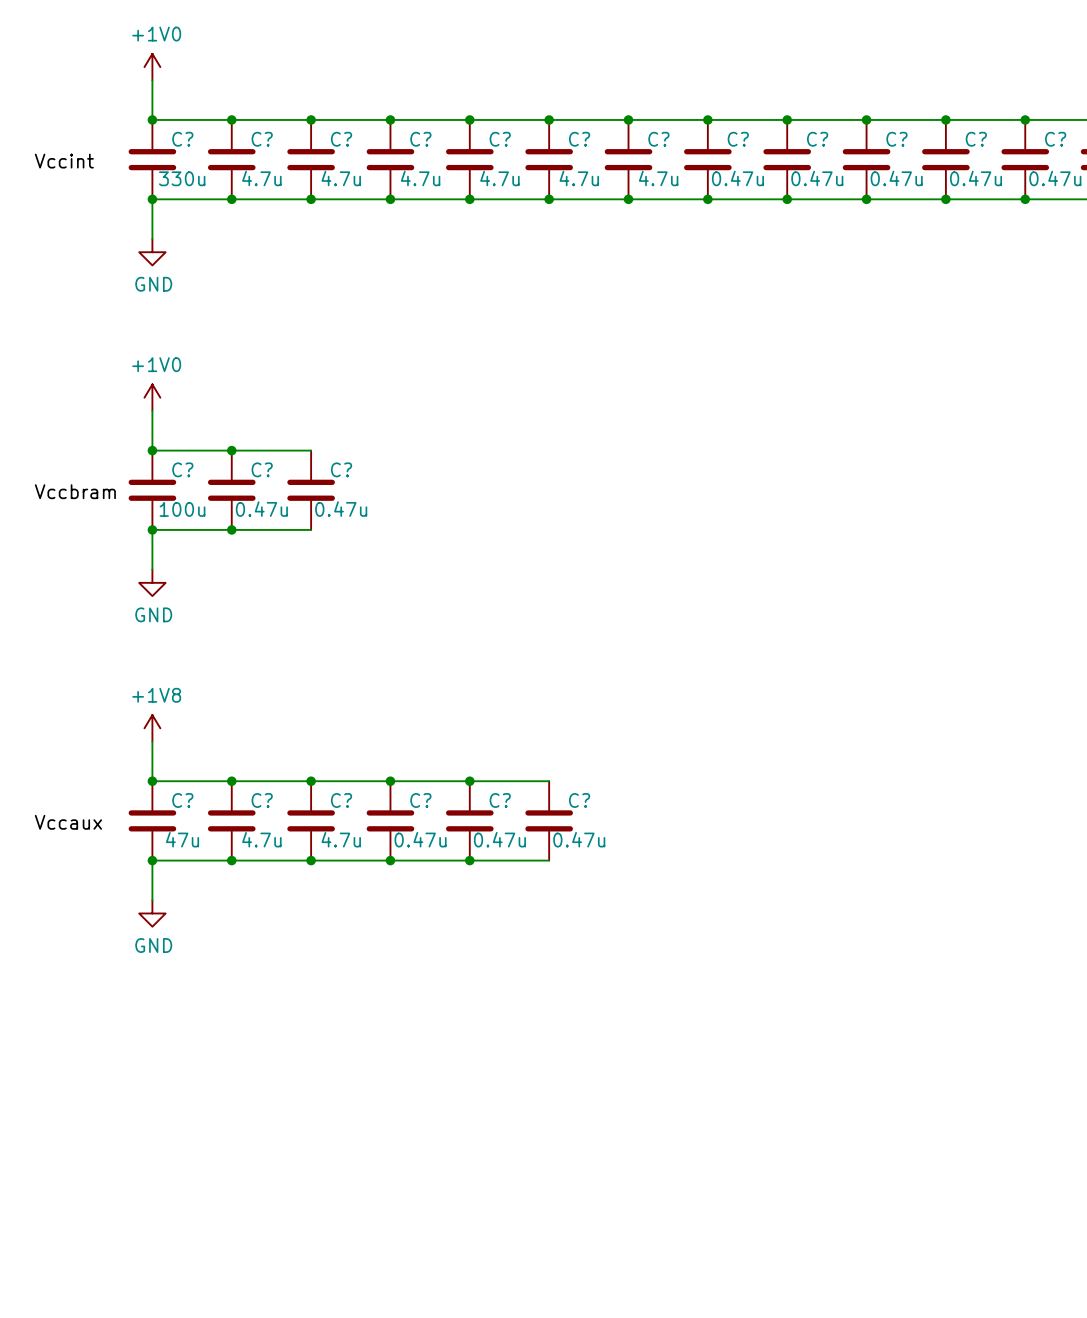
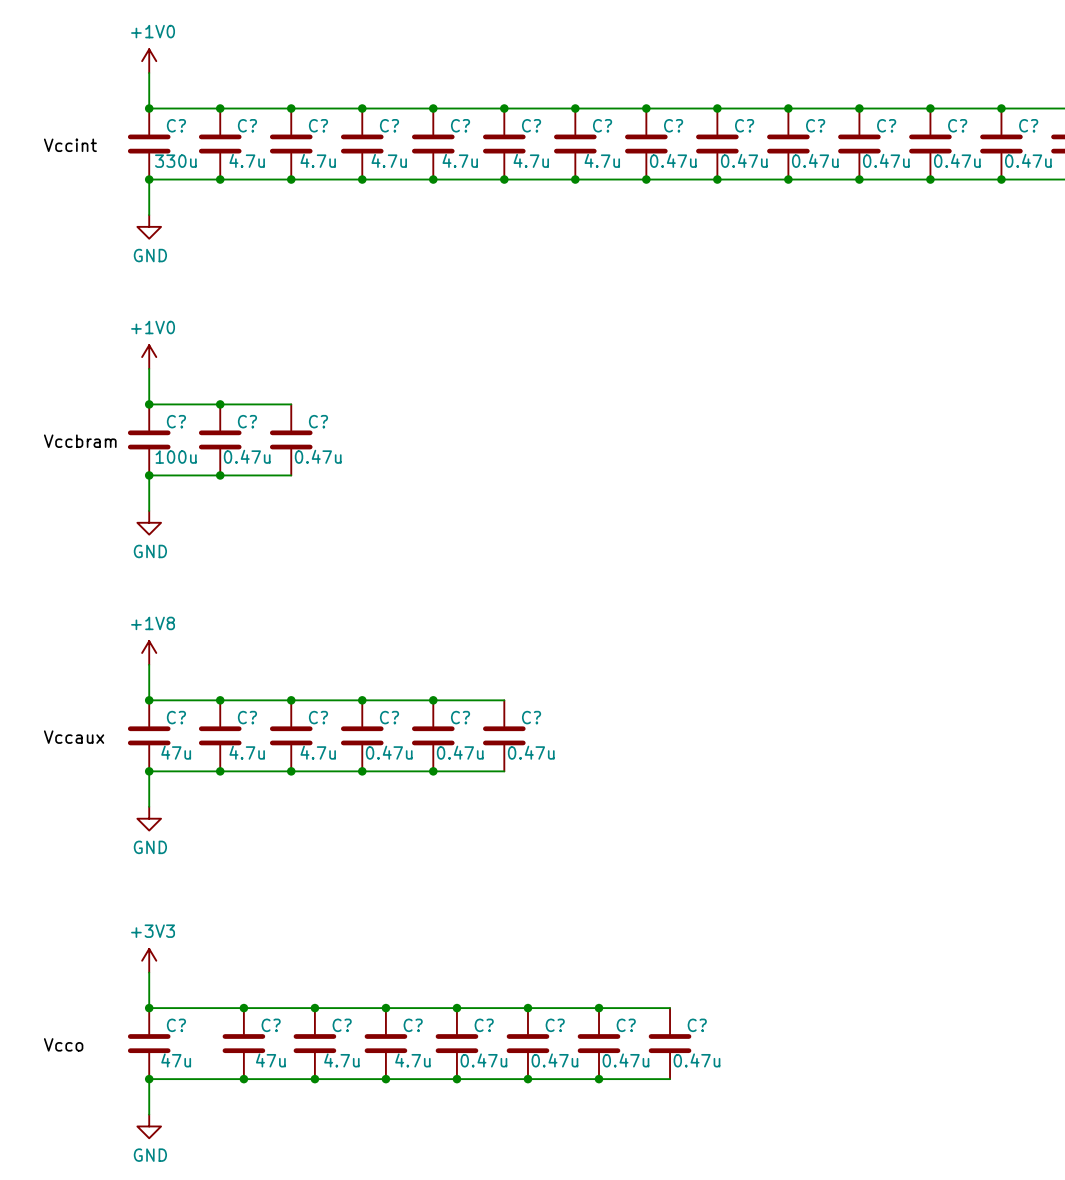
power symbol: none -> +3V3 (149, 960)
wire: none -> (149, 972) (149, 1008) (670, 1008)
junction: none -> (149, 1008)
junction: none -> (243, 1008)
junction: none -> (314, 1008)
junction: none -> (385, 1008)
junction: none -> (456, 1008)
junction: none -> (527, 1008)
junction: none -> (599, 1008)
C?: none -> 47u (149, 1043)
C?: none -> 47u (243, 1043)
C?: none -> 4.7u (314, 1043)
C?: none -> 4.7u (385, 1043)
C?: none -> 0.47u (456, 1043)
C?: none -> 0.47u (527, 1043)
C?: none -> 0.47u (599, 1043)
C?: none -> 0.47u (670, 1043)
label: none -> Vcco (63, 1044)
junction: none -> (149, 1079)
junction: none -> (243, 1079)
junction: none -> (314, 1079)
junction: none -> (385, 1079)
junction: none -> (456, 1079)
junction: none -> (527, 1079)
junction: none -> (599, 1079)
wire: none -> (670, 1079) (149, 1079) (149, 1114)
power symbol: none -> GND (149, 1126)

